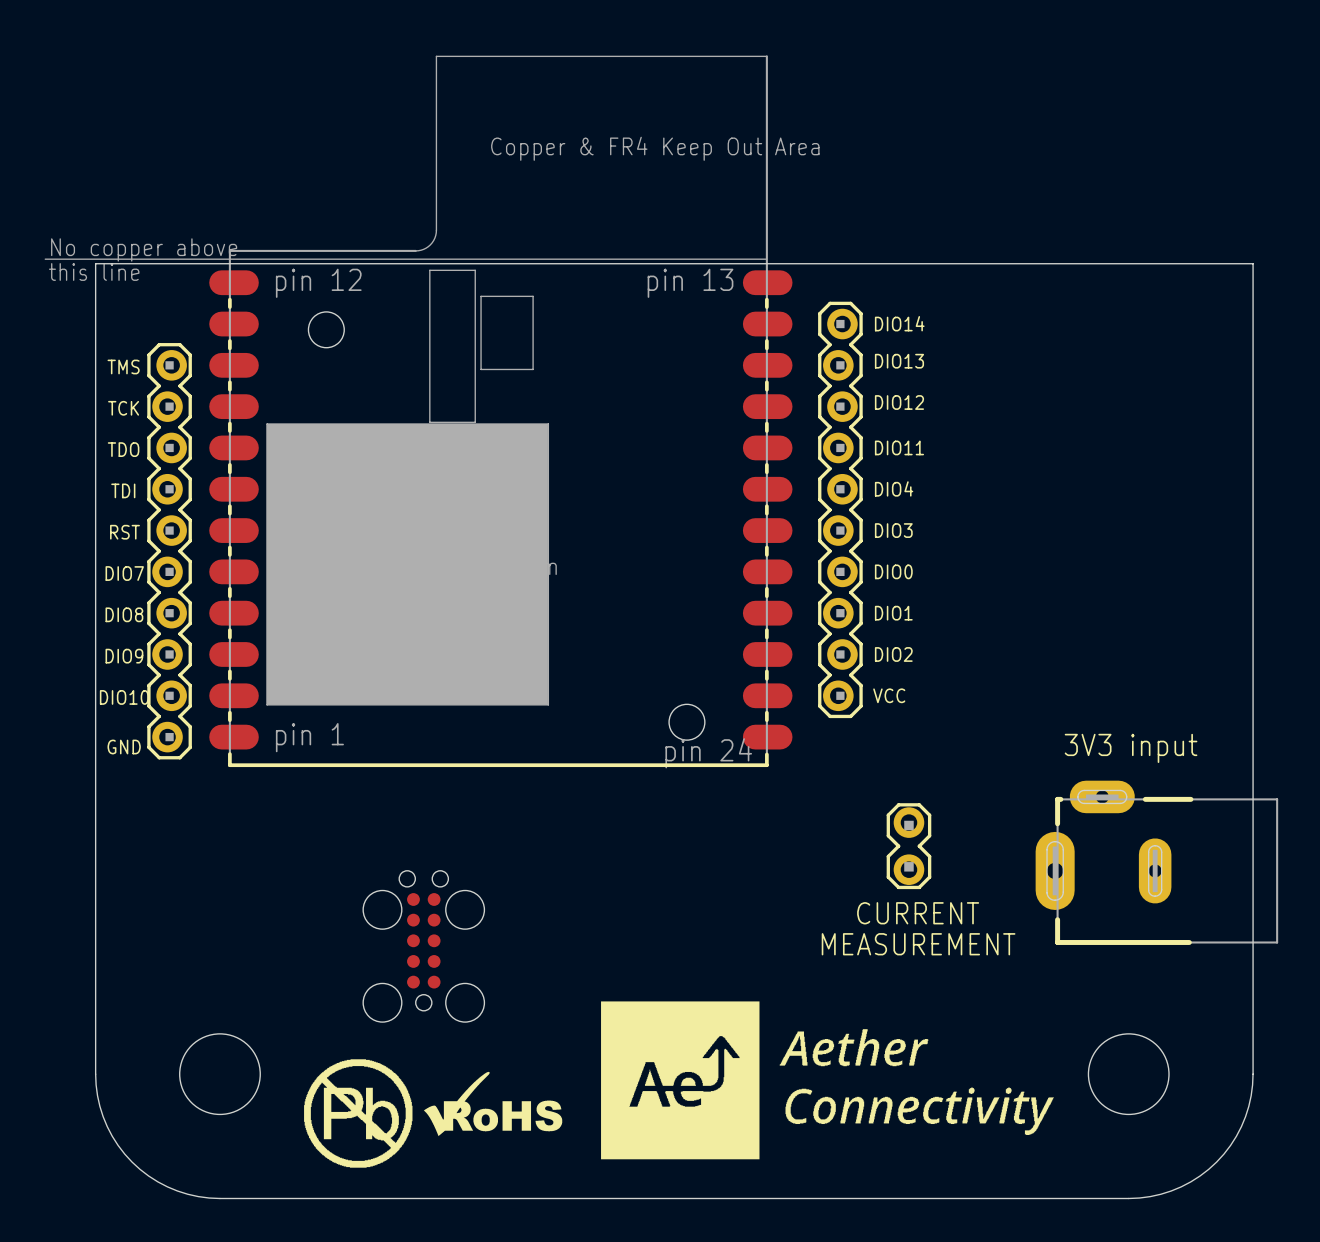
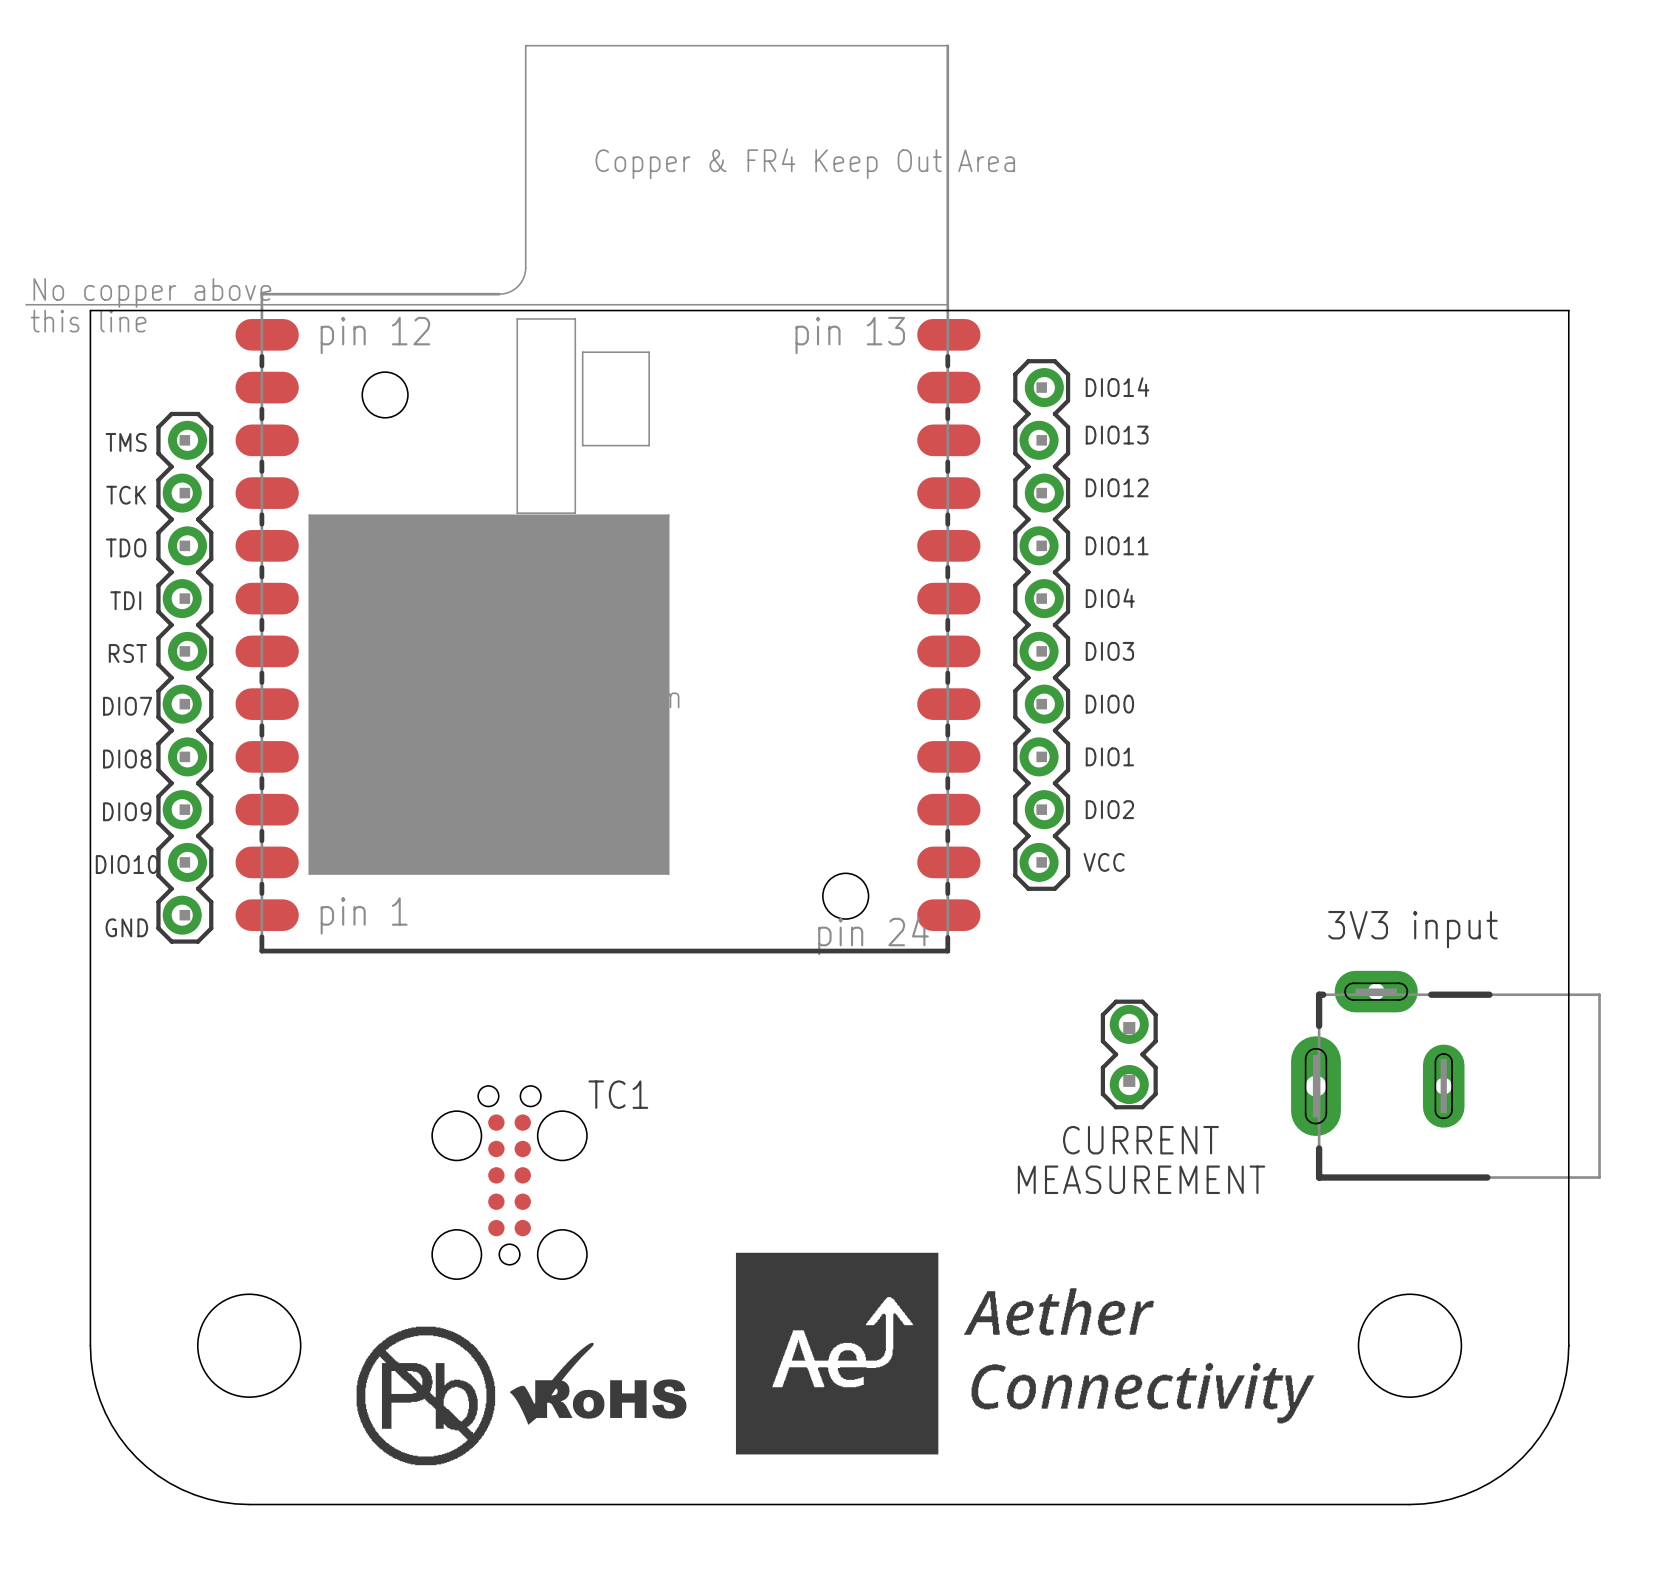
TC1 name: none -> TC1 (618, 1094)

